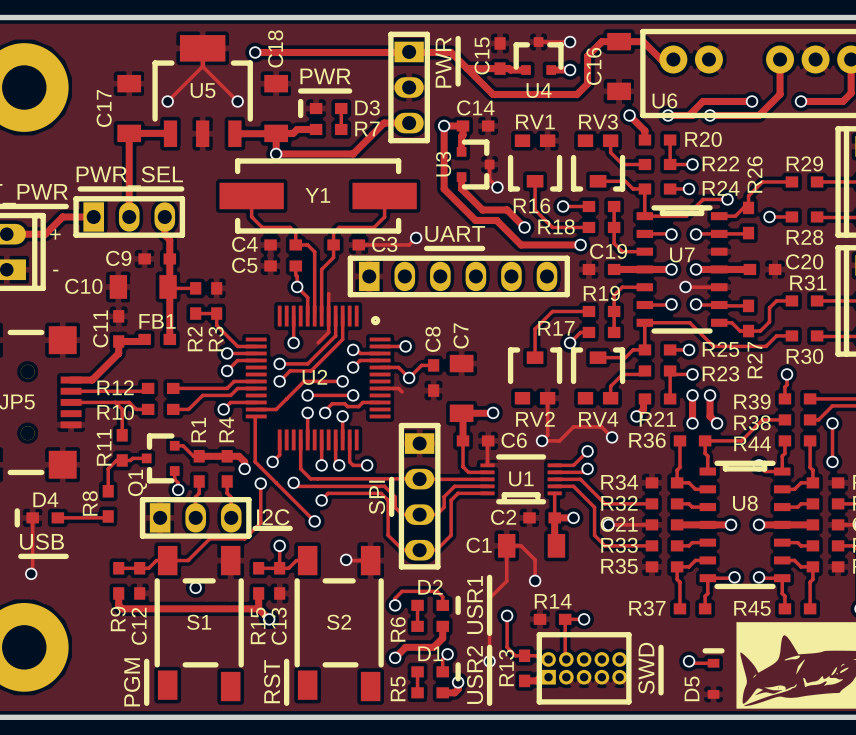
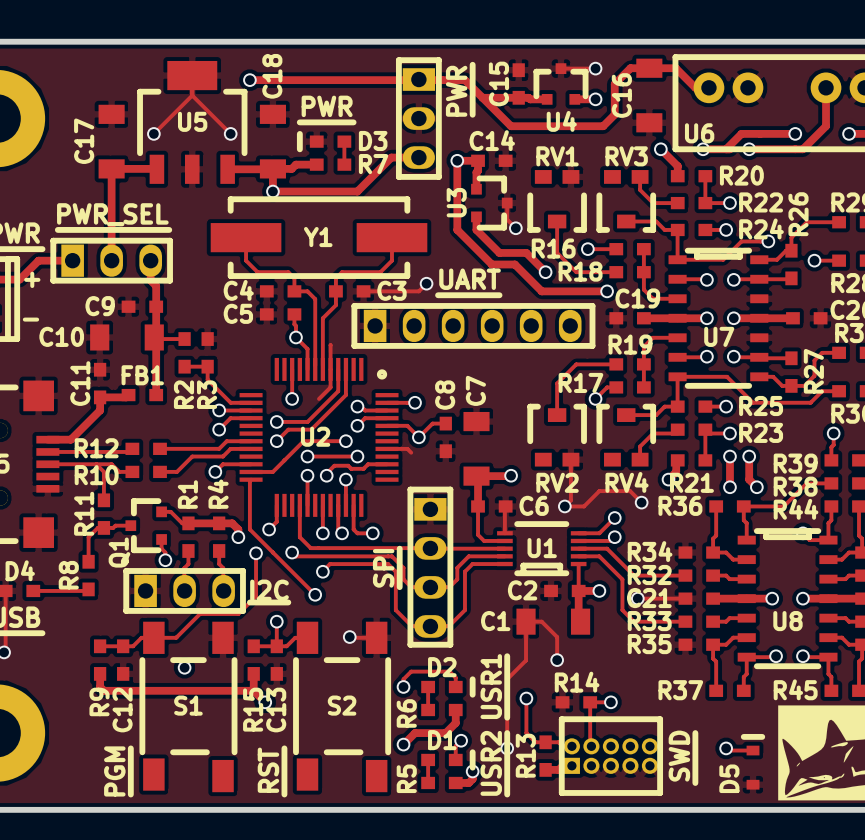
U7 name position: U7 (682, 255) -> U7 (719, 336)
track: (685, 286) (719, 287) -> none
via: (685, 286) -> none
R27 name position: R27 (754, 360) -> R27 (813, 371)
U8 name position: U8 (745, 503) -> U8 (787, 621)

